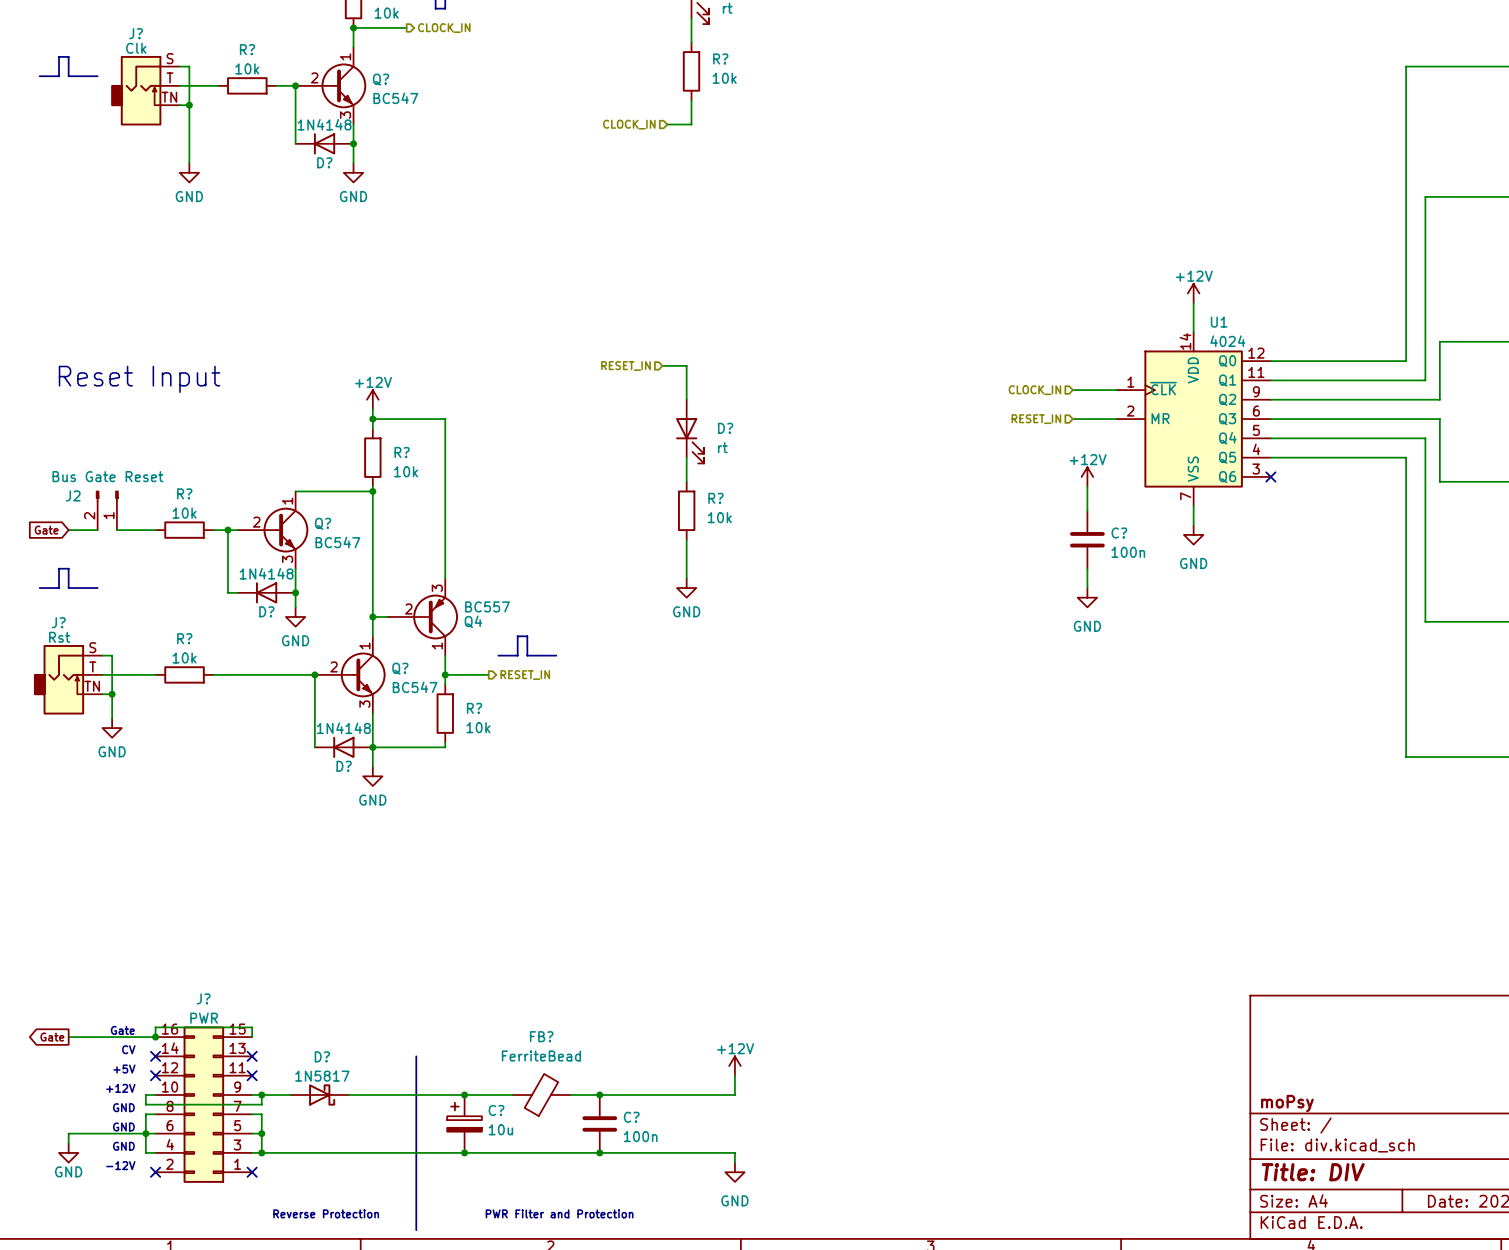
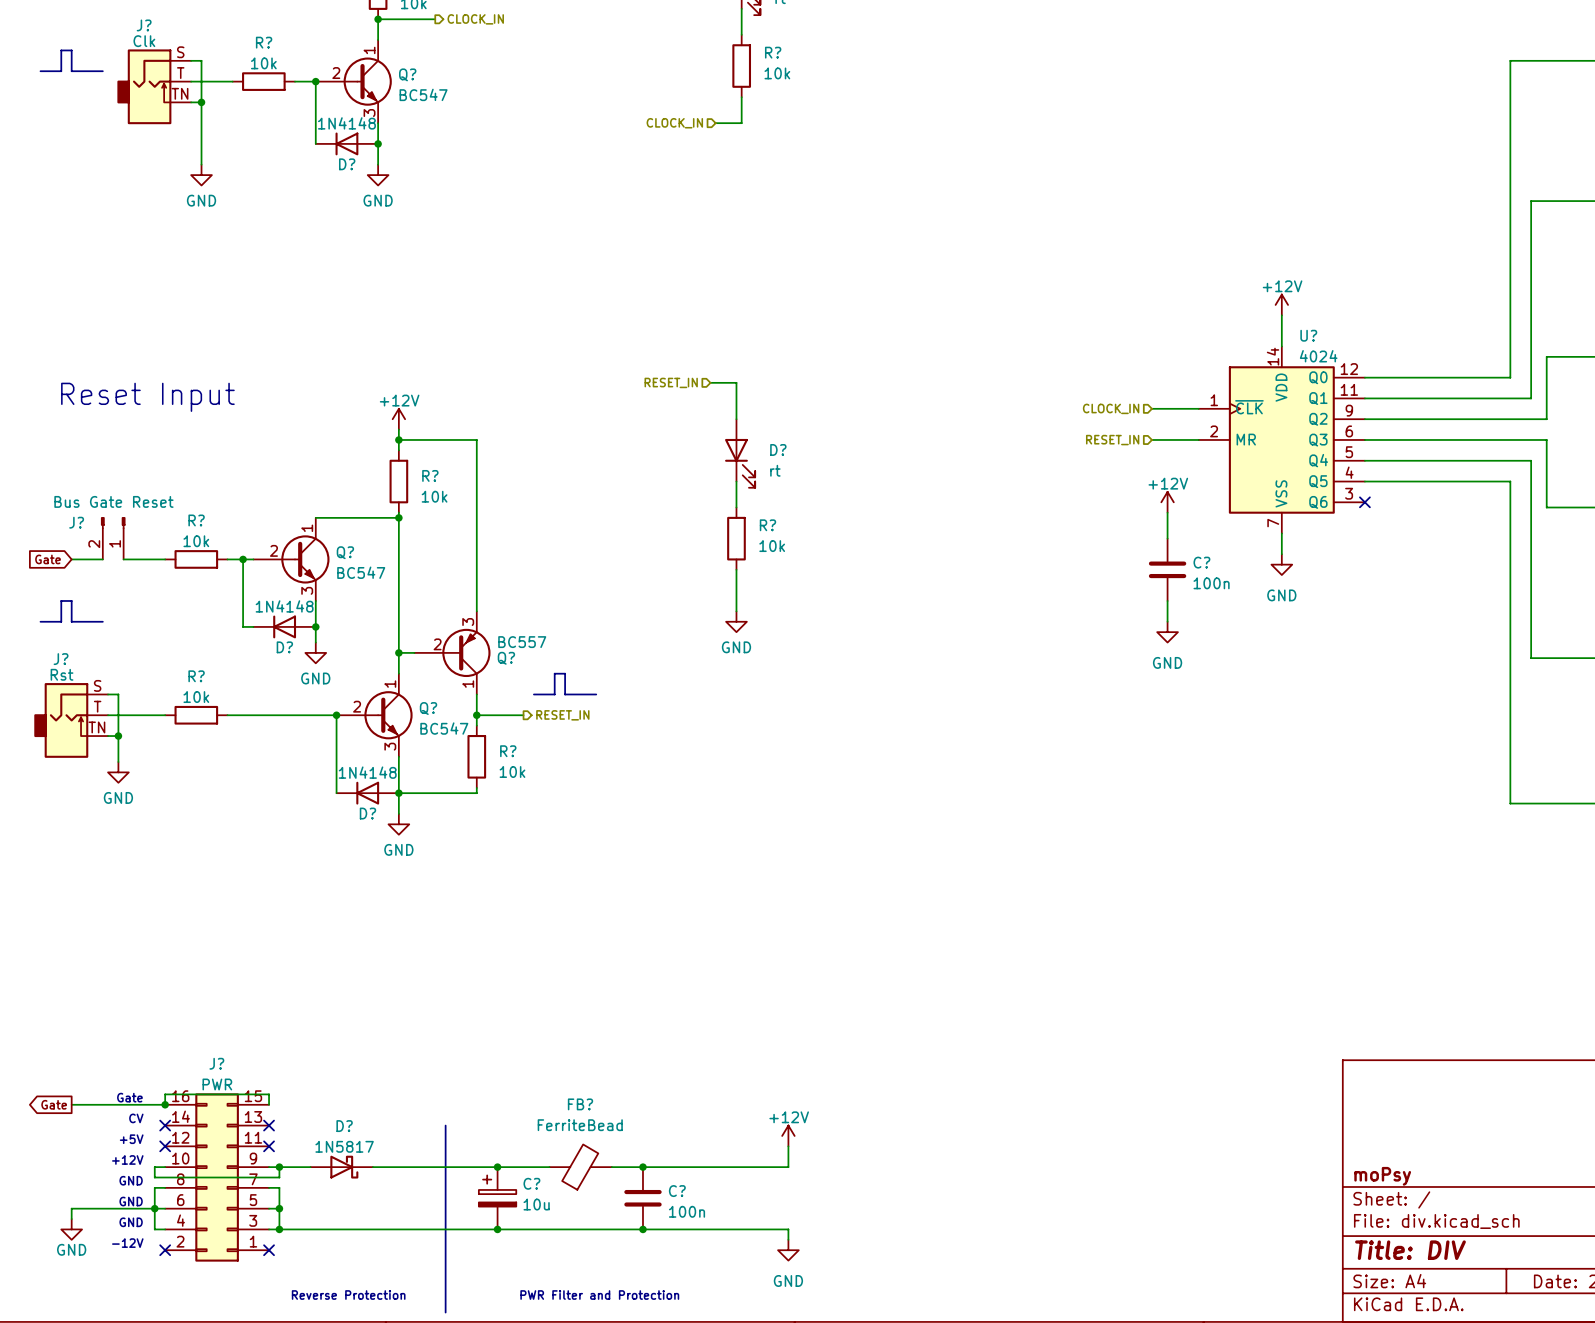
U1 name: U1 (1219, 322) -> U? (1308, 335)
J2 name: J2 (73, 495) -> J? (76, 522)
Q4 name: Q4 (473, 621) -> Q? (506, 658)

